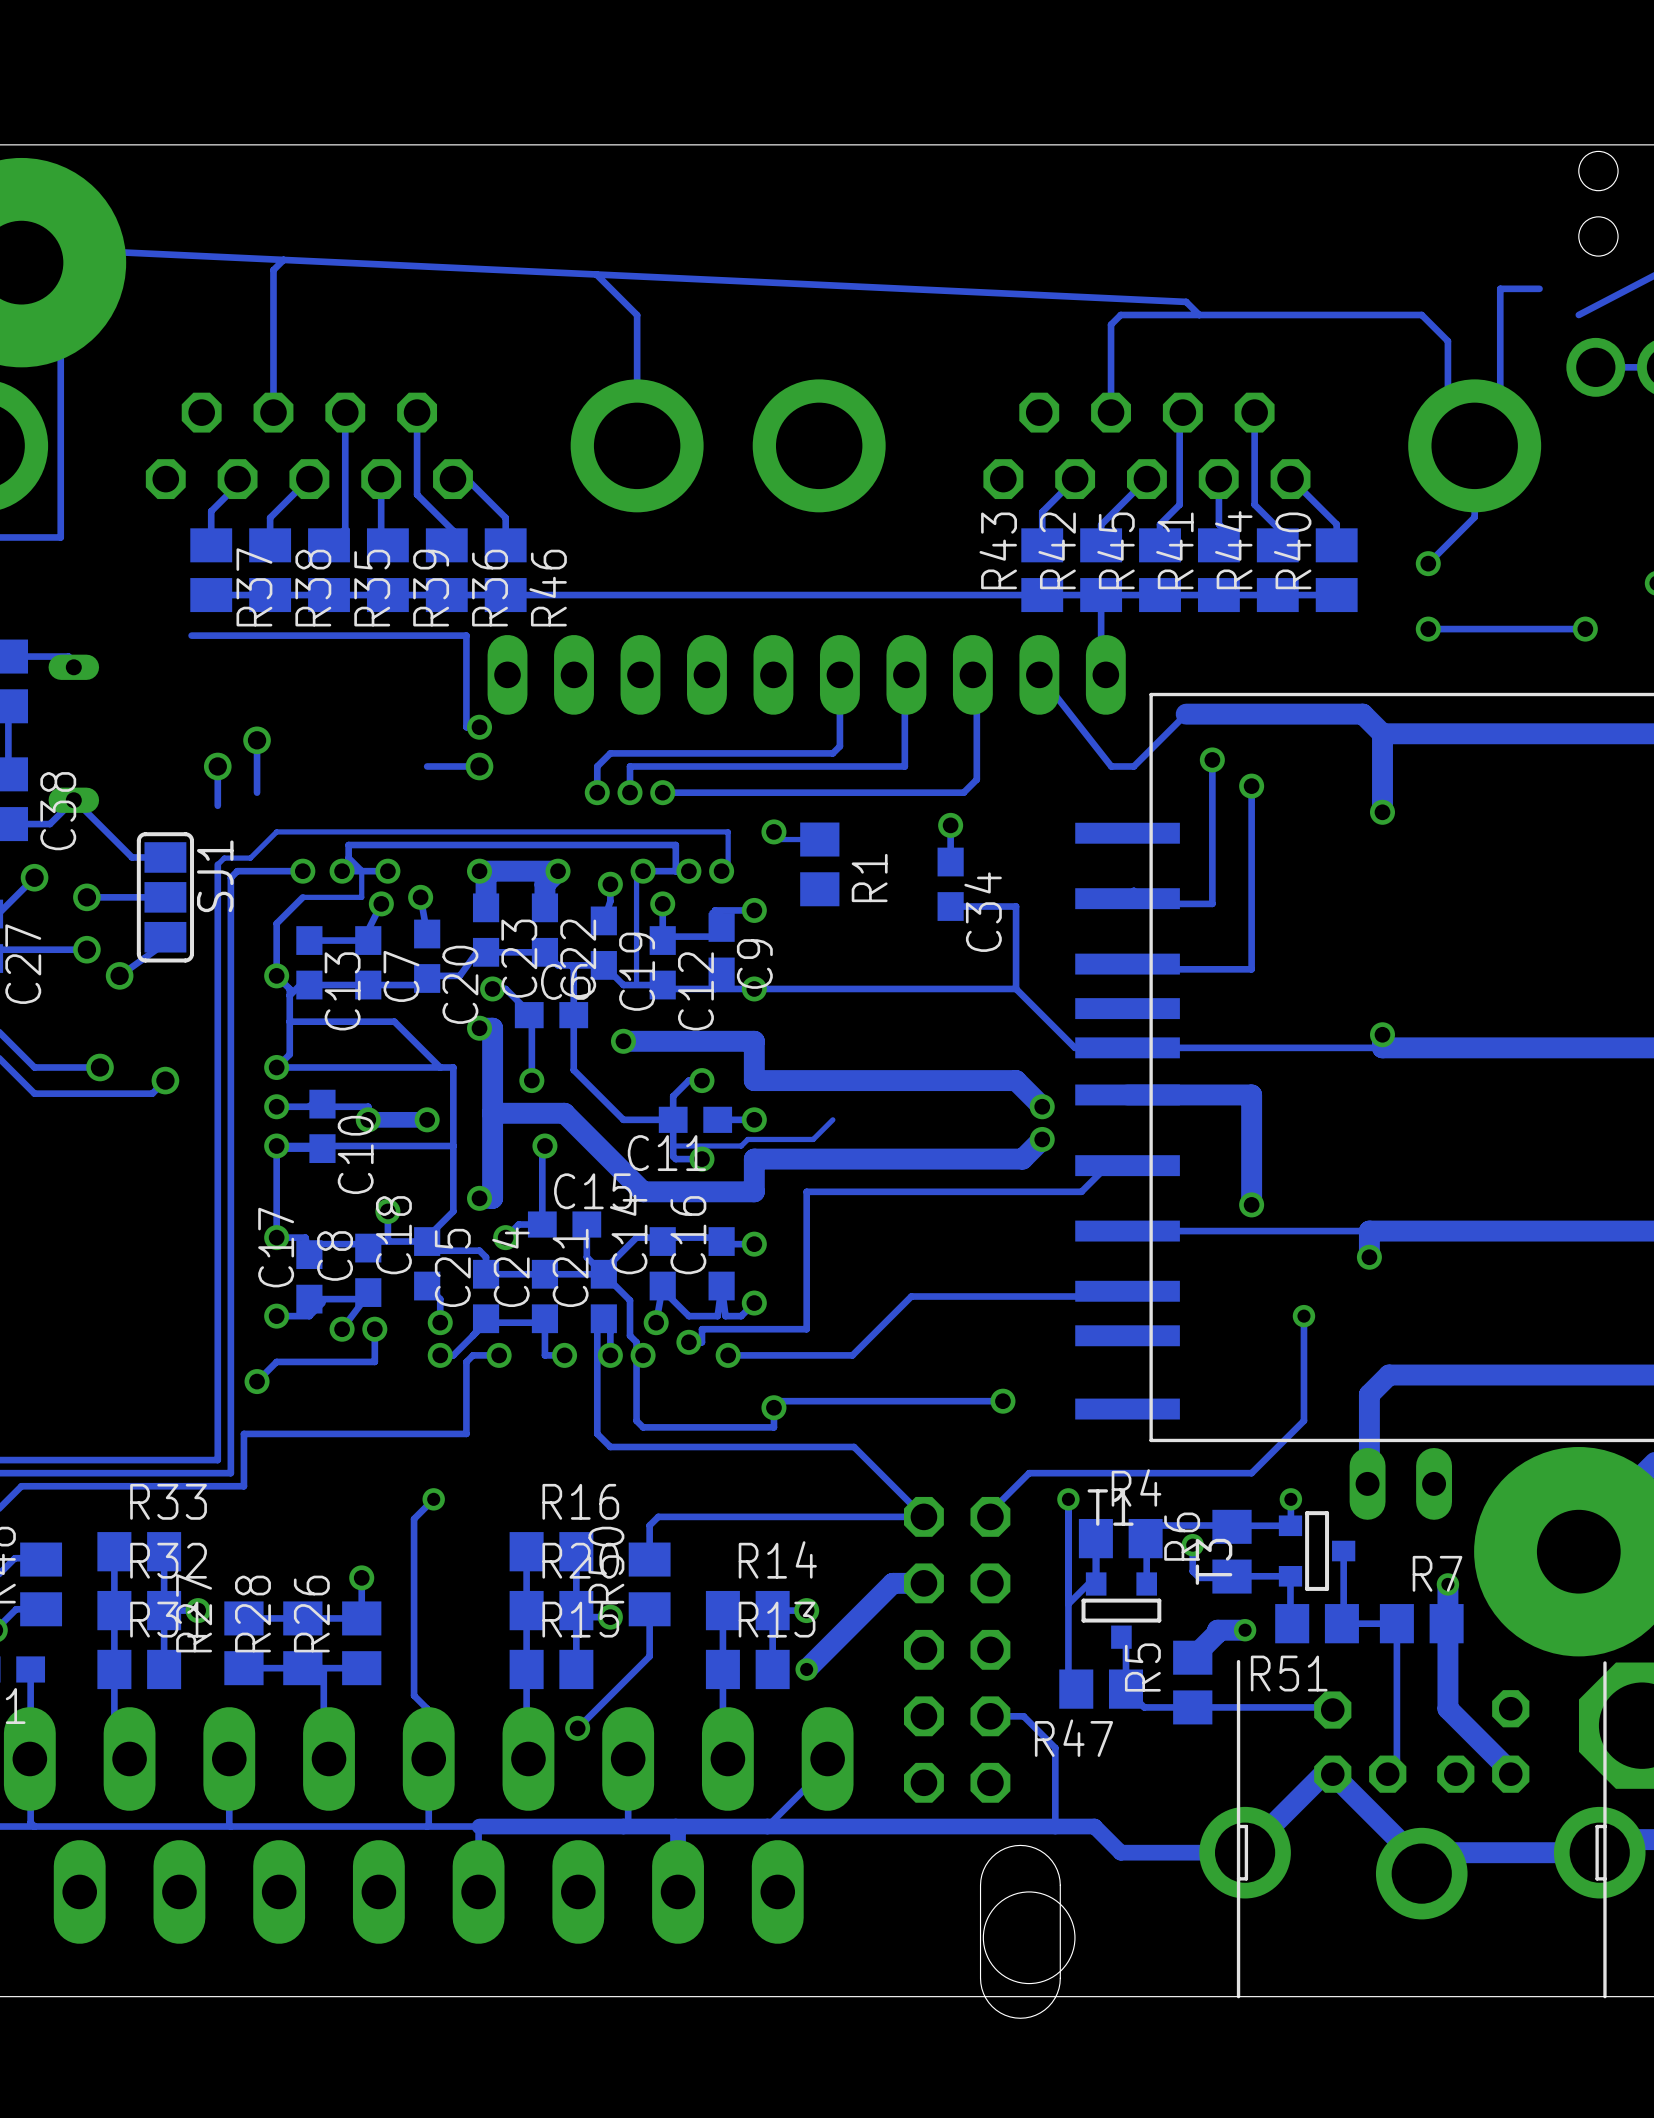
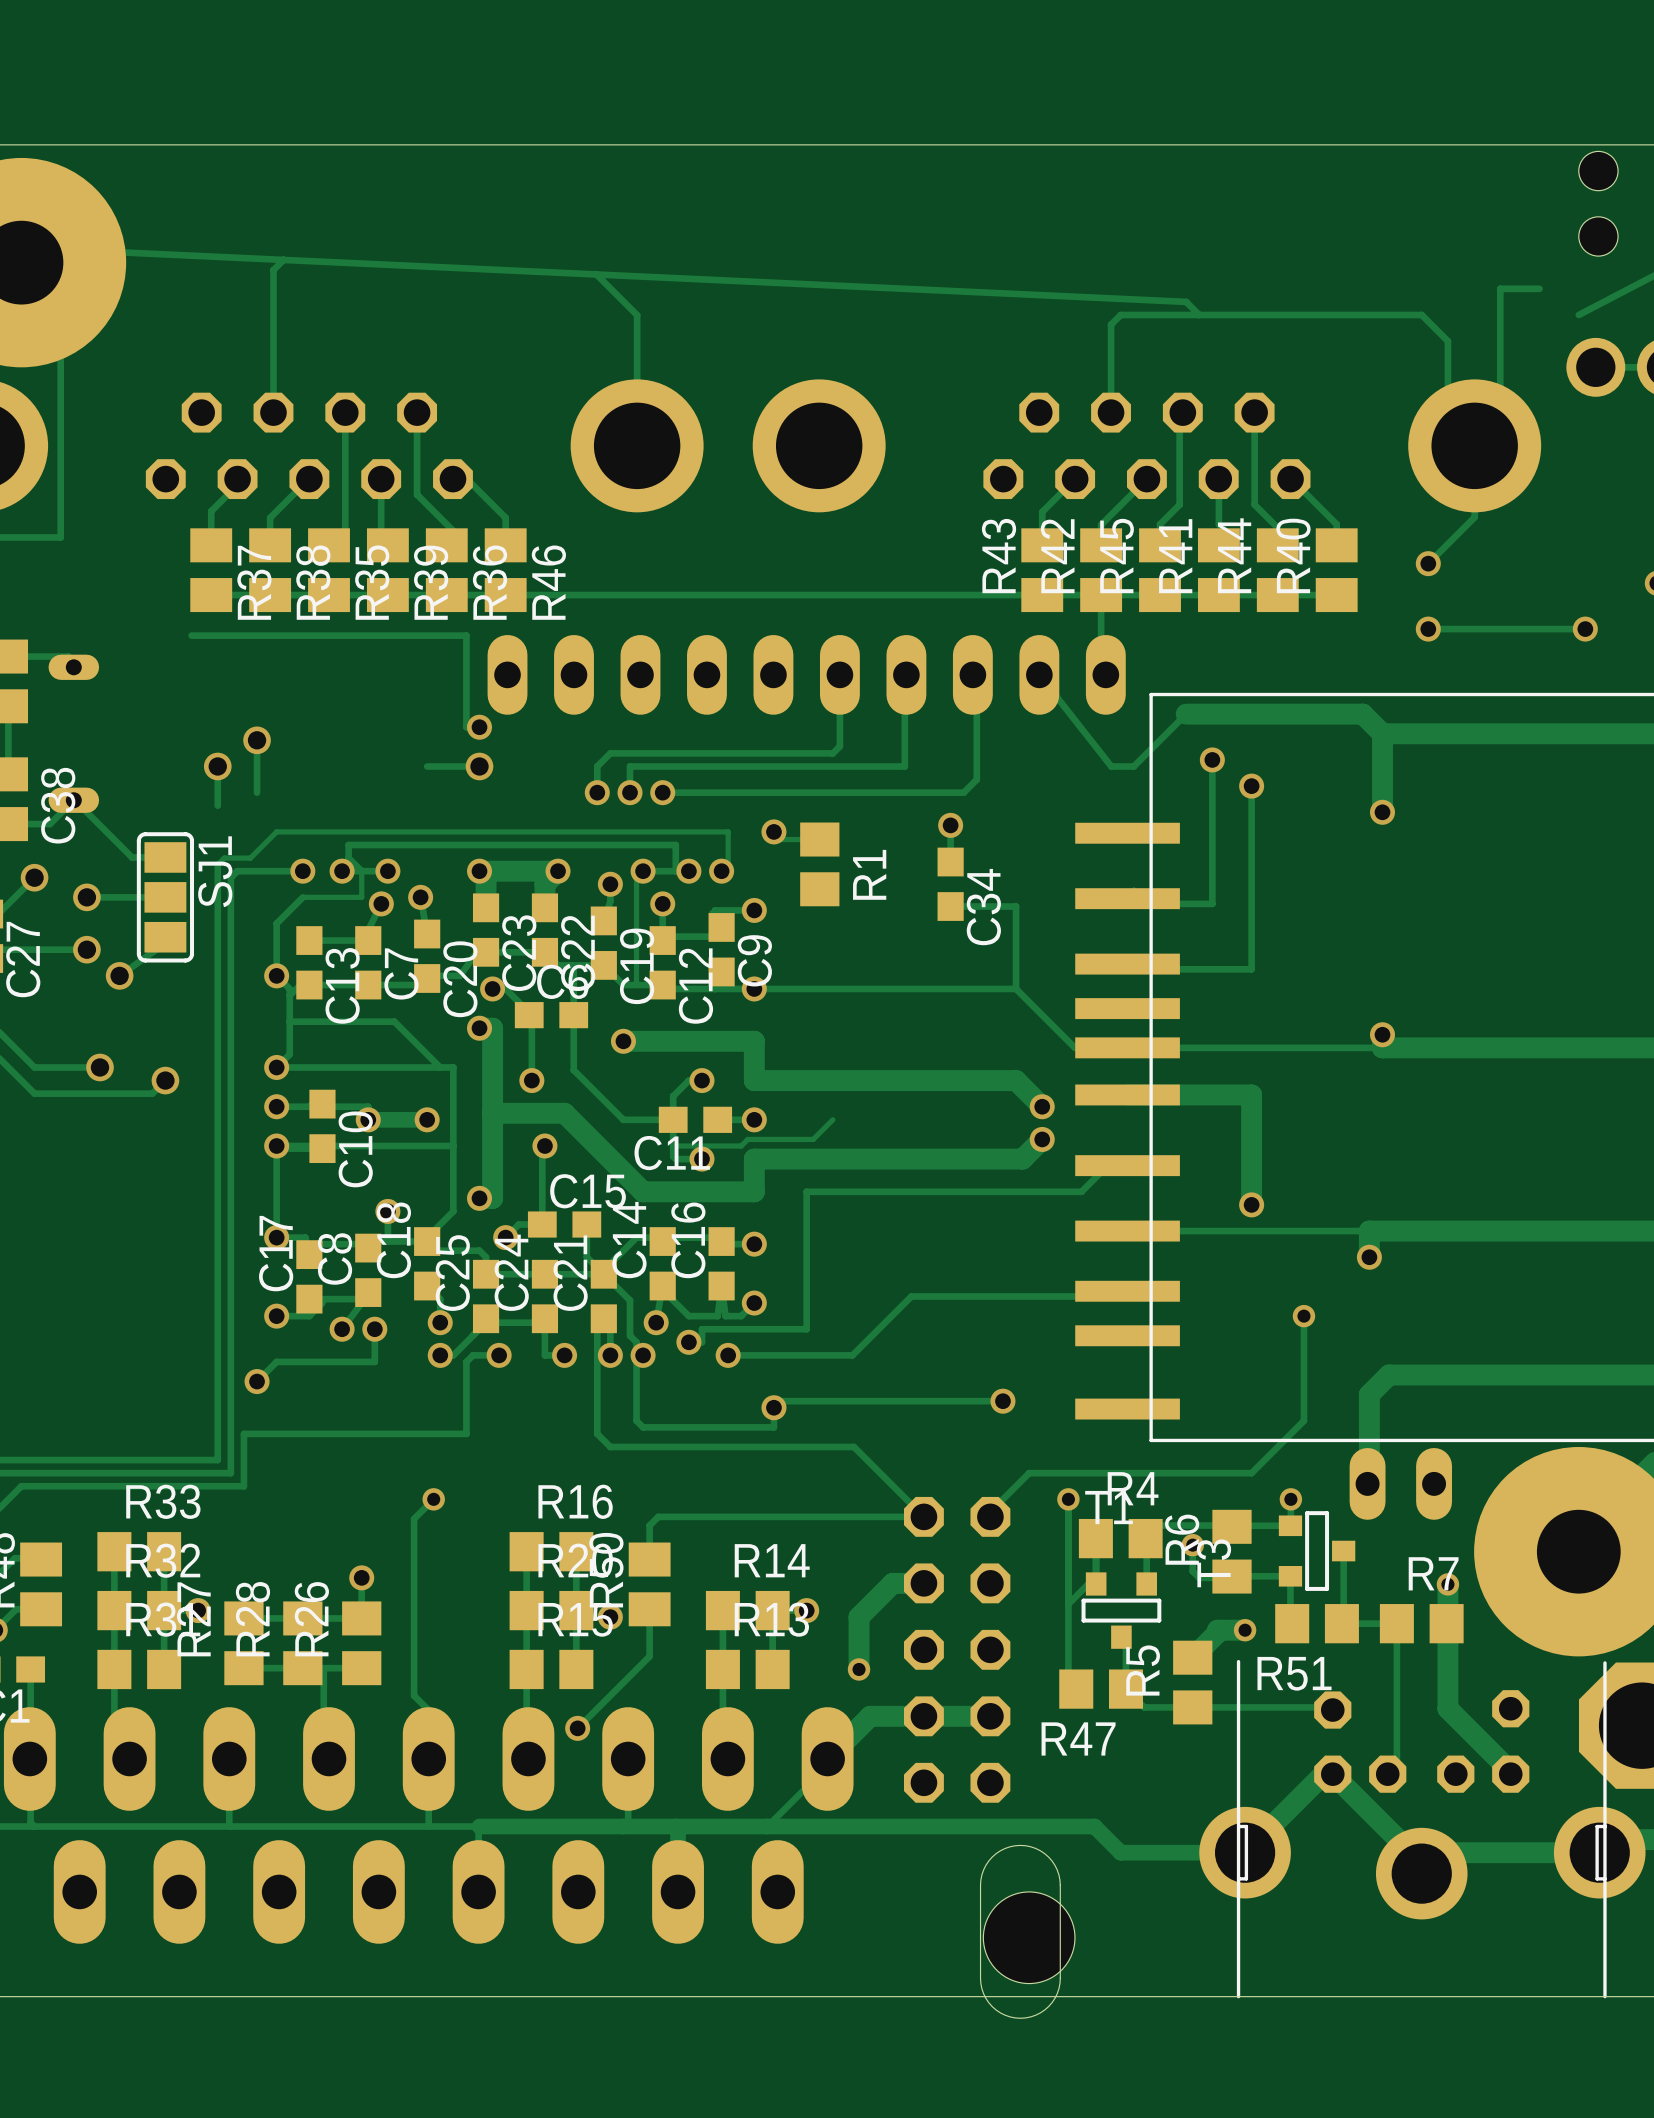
track: (859, 1617) (806, 1669) -> (859, 1617) (859, 1669)
via position: (806, 1669) -> (859, 1669)
track: (990, 1716) (1023, 1716) (1055, 1747) (1055, 1826) -> (990, 1716) (870, 1716) (827, 1758)

